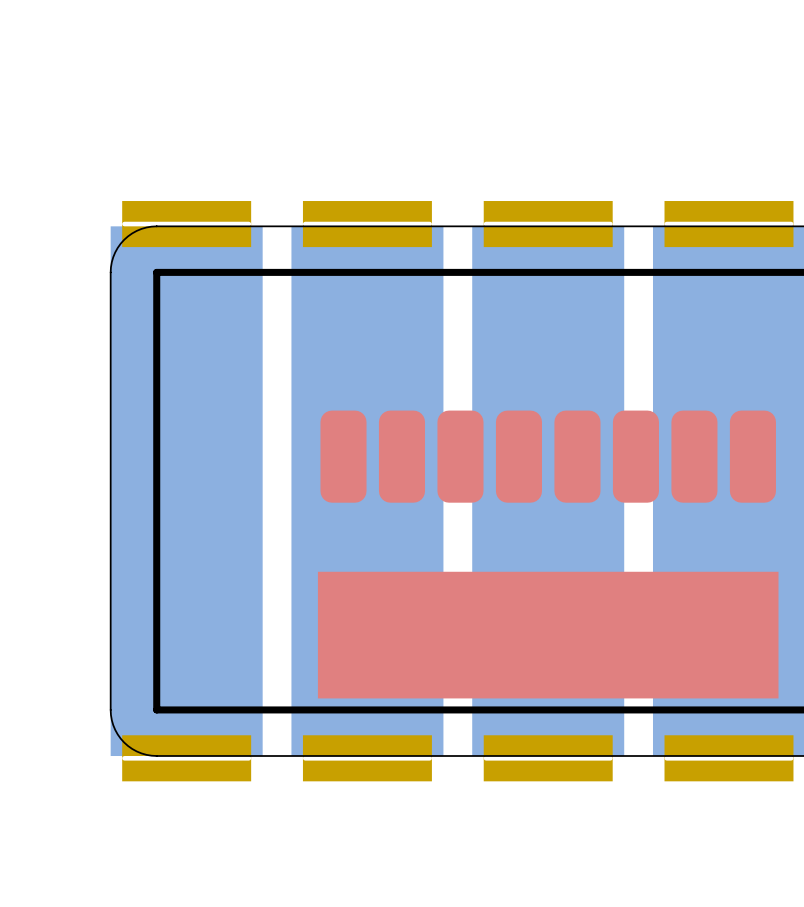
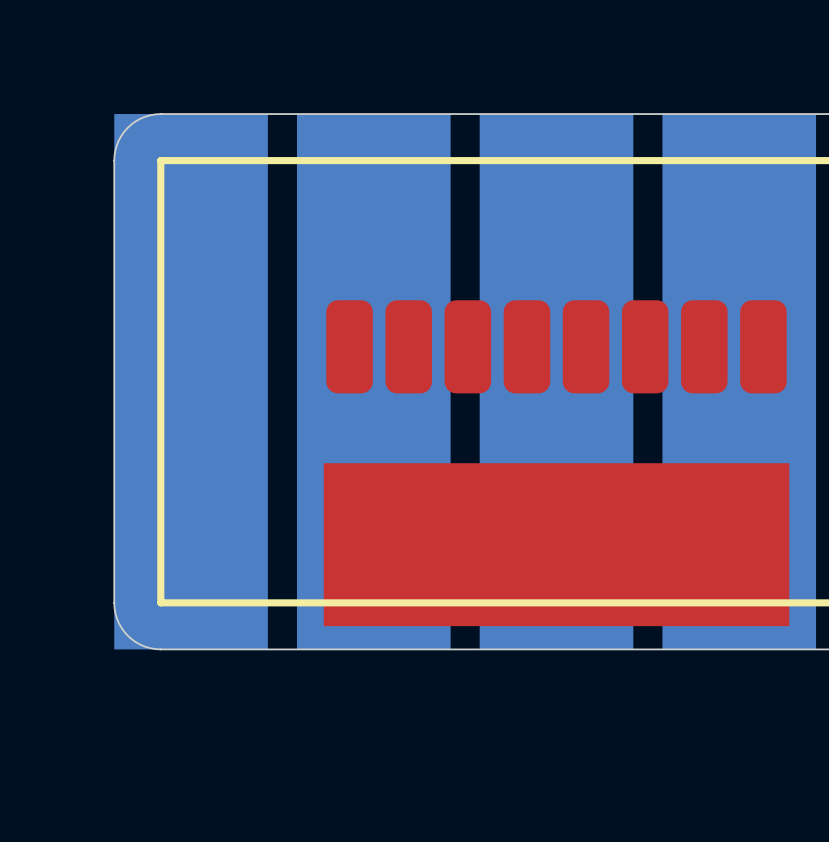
part: (186, 224) -> none
part: (367, 224) -> none
part: (548, 224) -> none
part: (728, 224) -> none
drawing shape: [317, 571, 779, 699] -> [323, 463, 790, 627]
part: (186, 758) -> none
part: (367, 758) -> none
part: (548, 758) -> none
part: (728, 758) -> none

